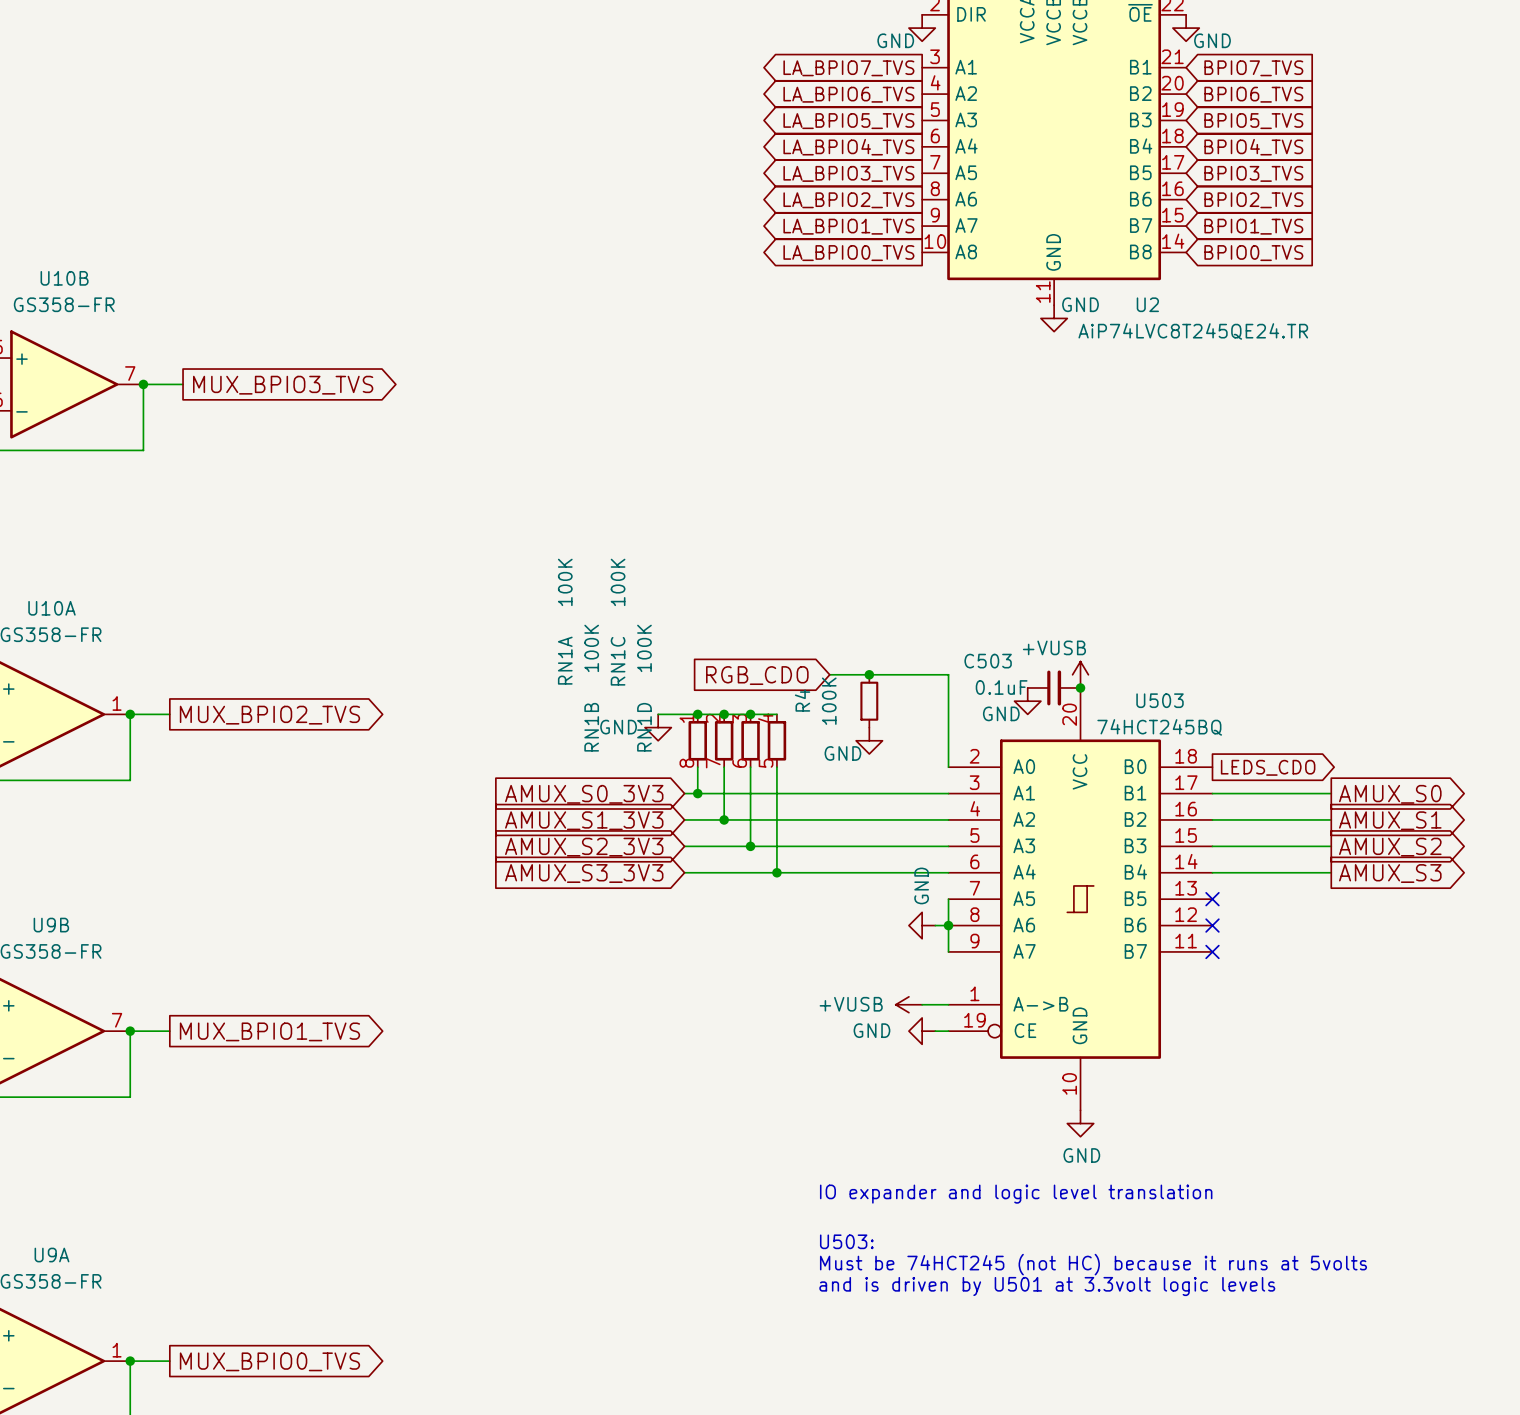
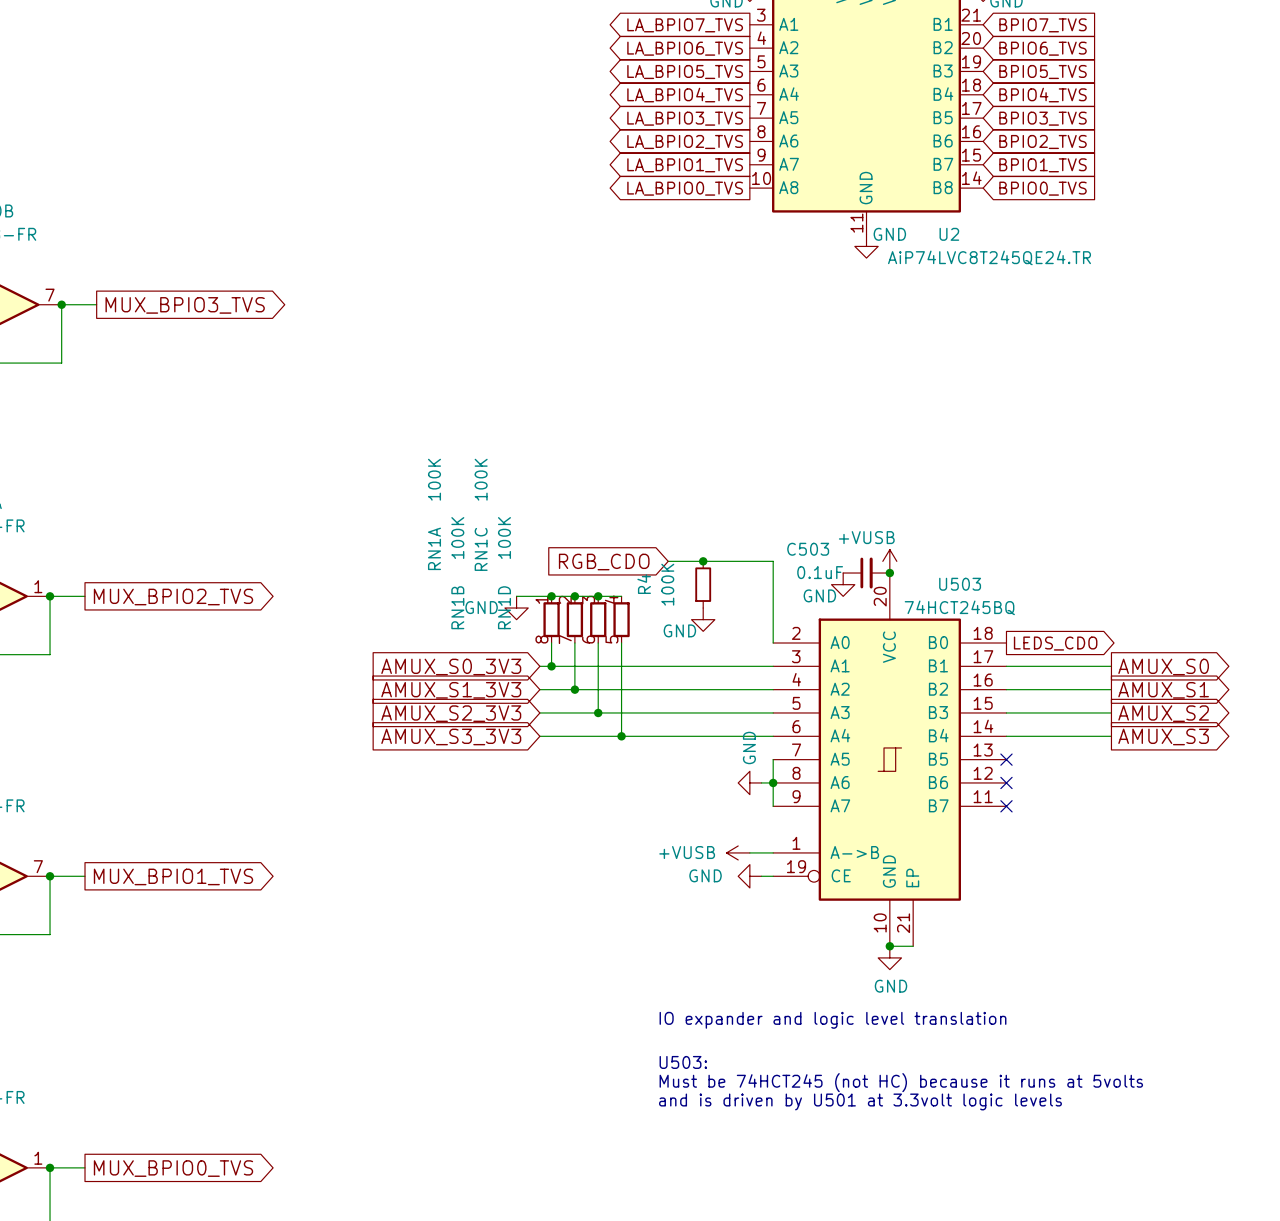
U503 symbol: [948, 687, 1213, 1111] -> [773, 573, 1007, 947]
wire: none -> (889, 946) (913, 946)
junction: none -> (889, 946)

